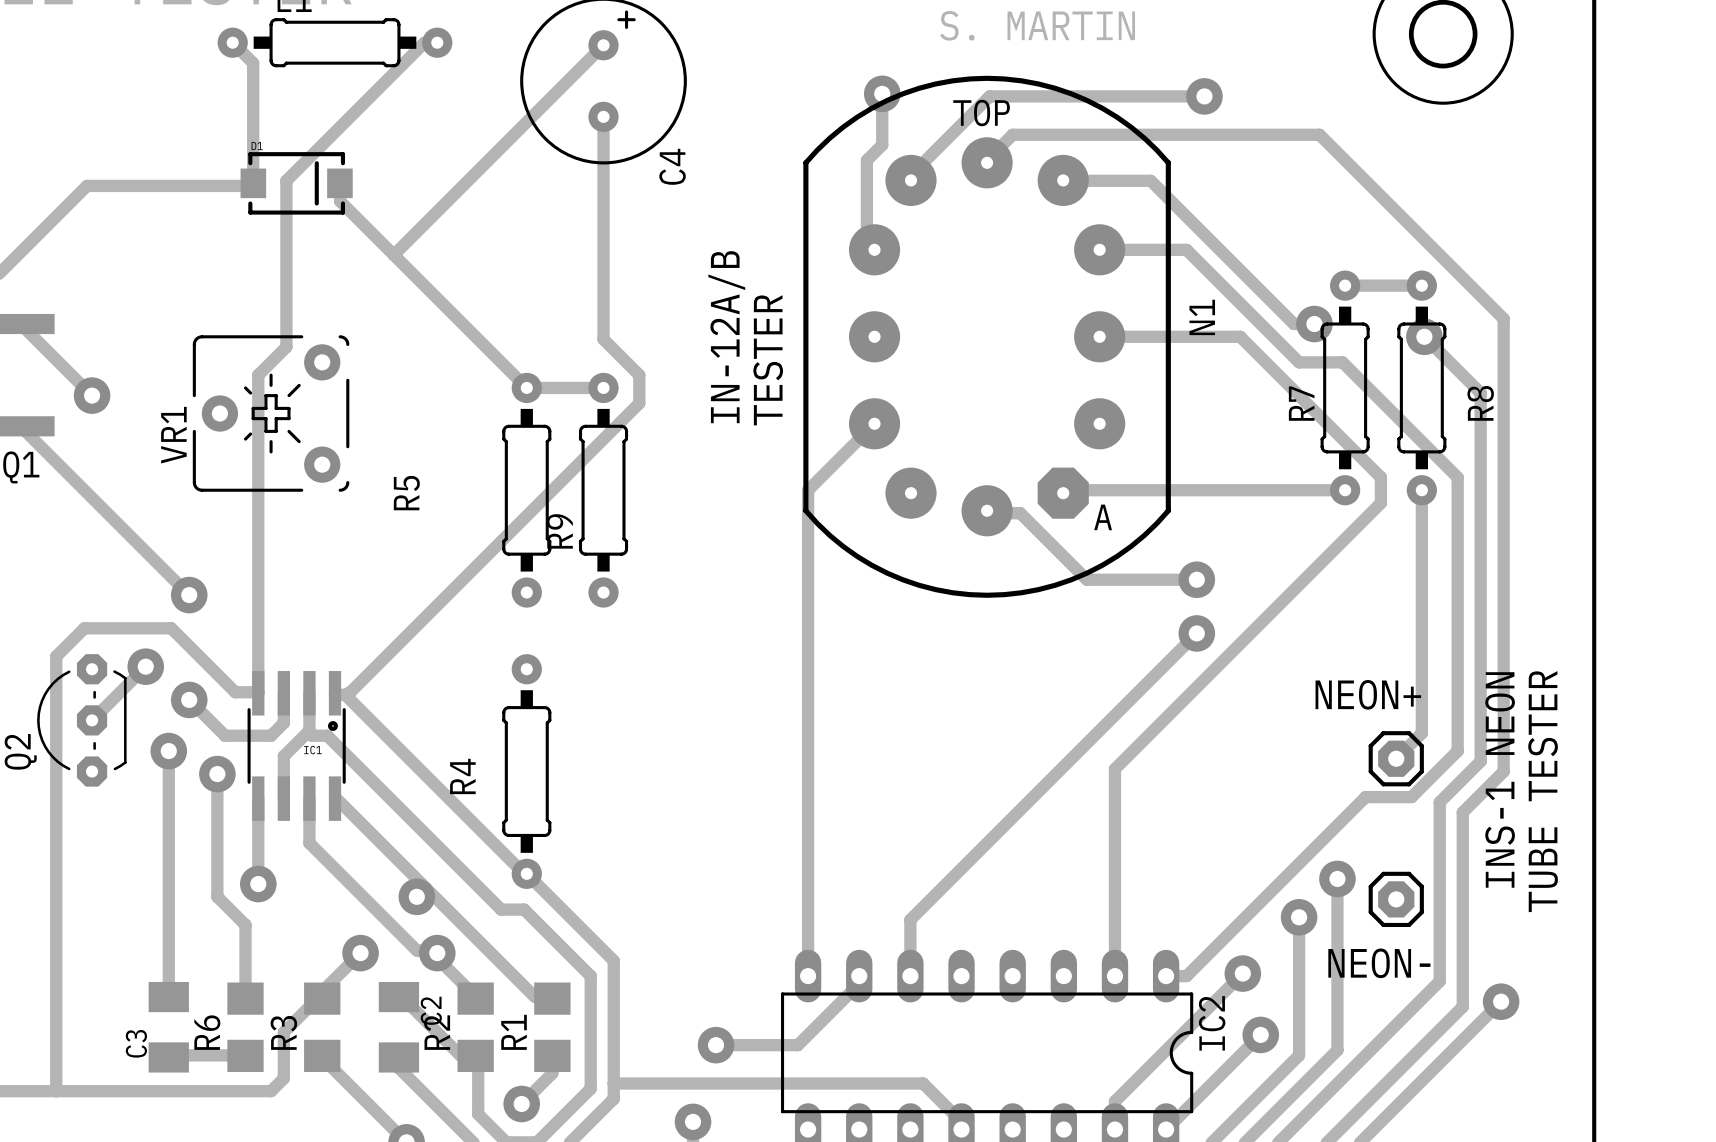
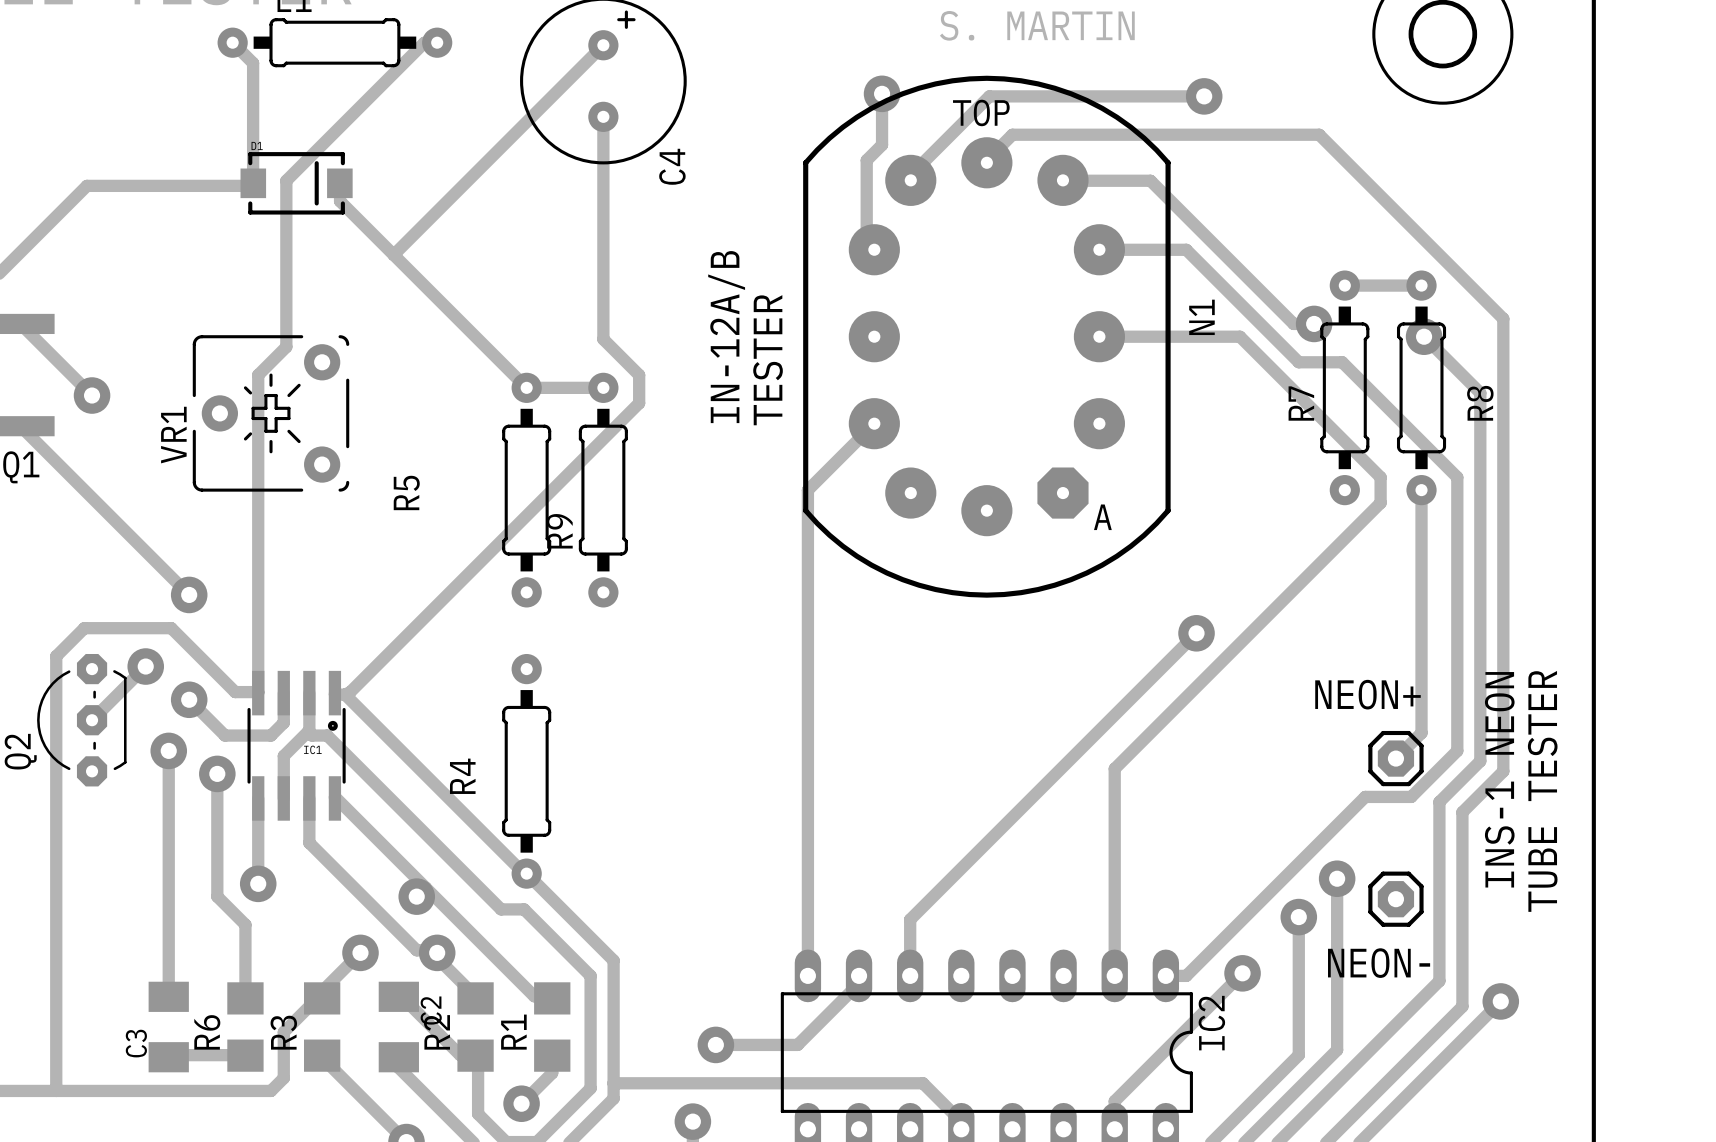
track: (1345, 490) (1066, 490) (1063, 493) -> none
track: (987, 510) (987, 513) (1020, 513) (1086, 579) (1196, 579) -> none
via: (1196, 579) -> none
track: (1260, 1034) (1166, 1129) -> none
via: (1260, 1034) -> none

